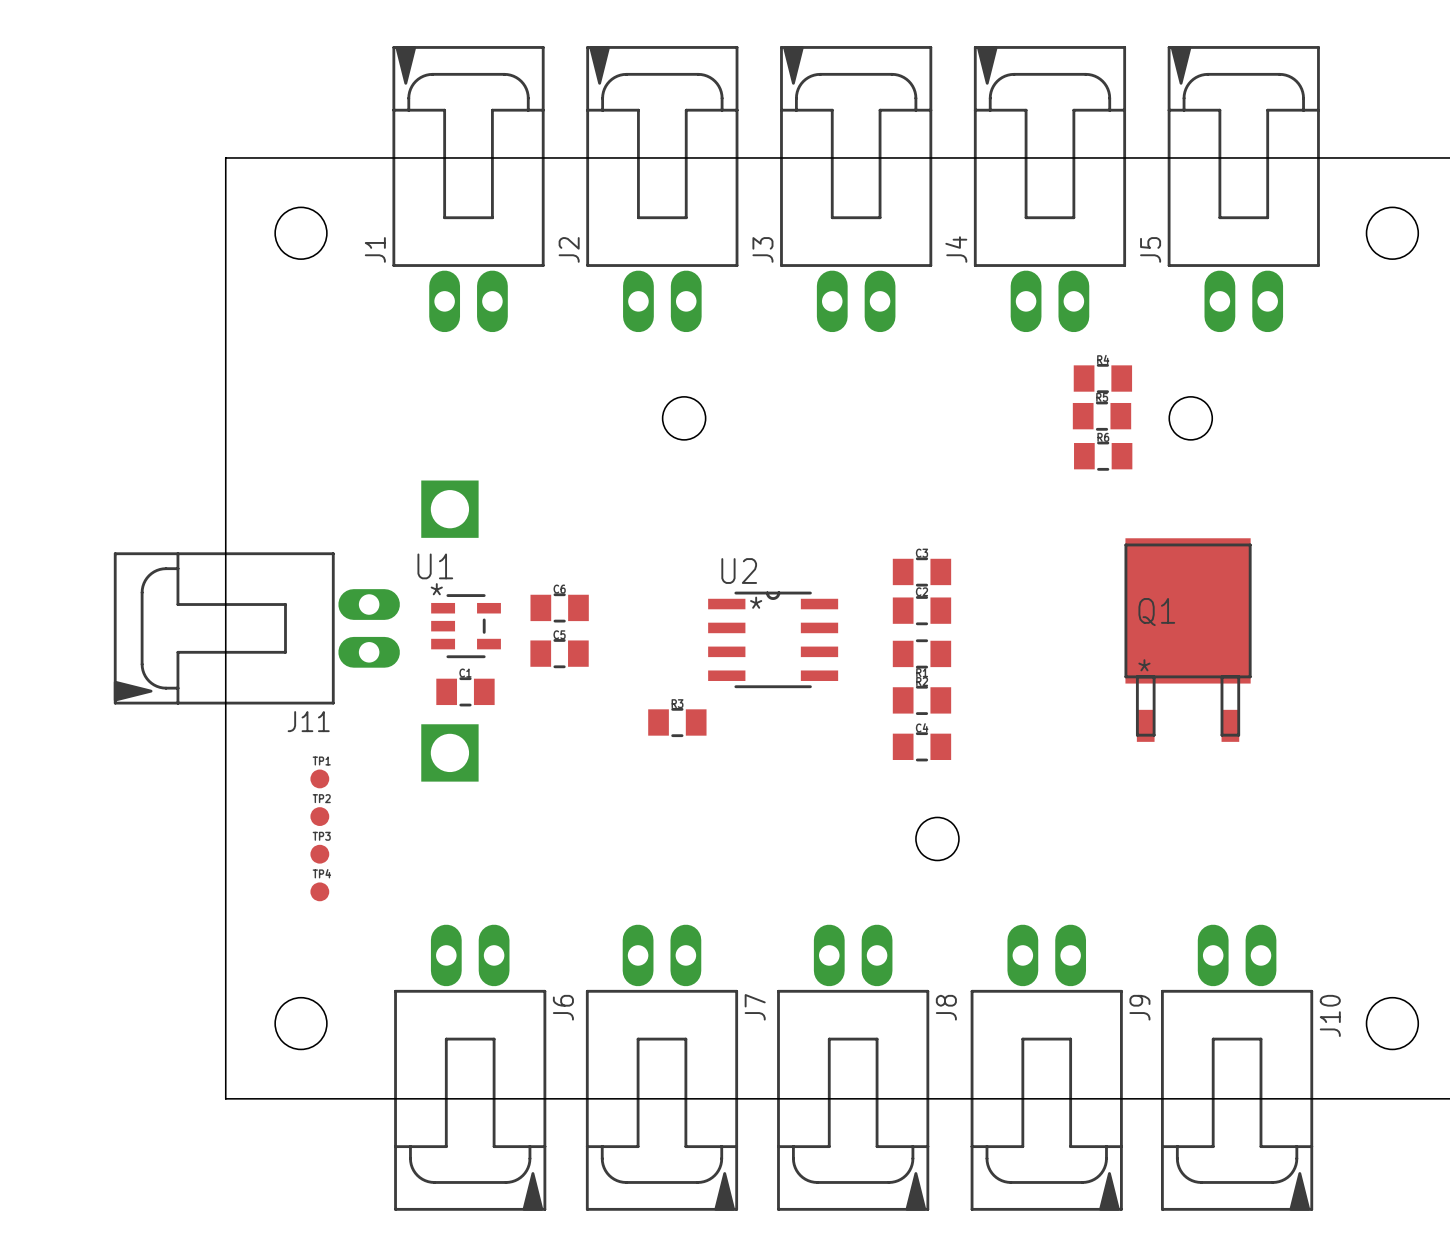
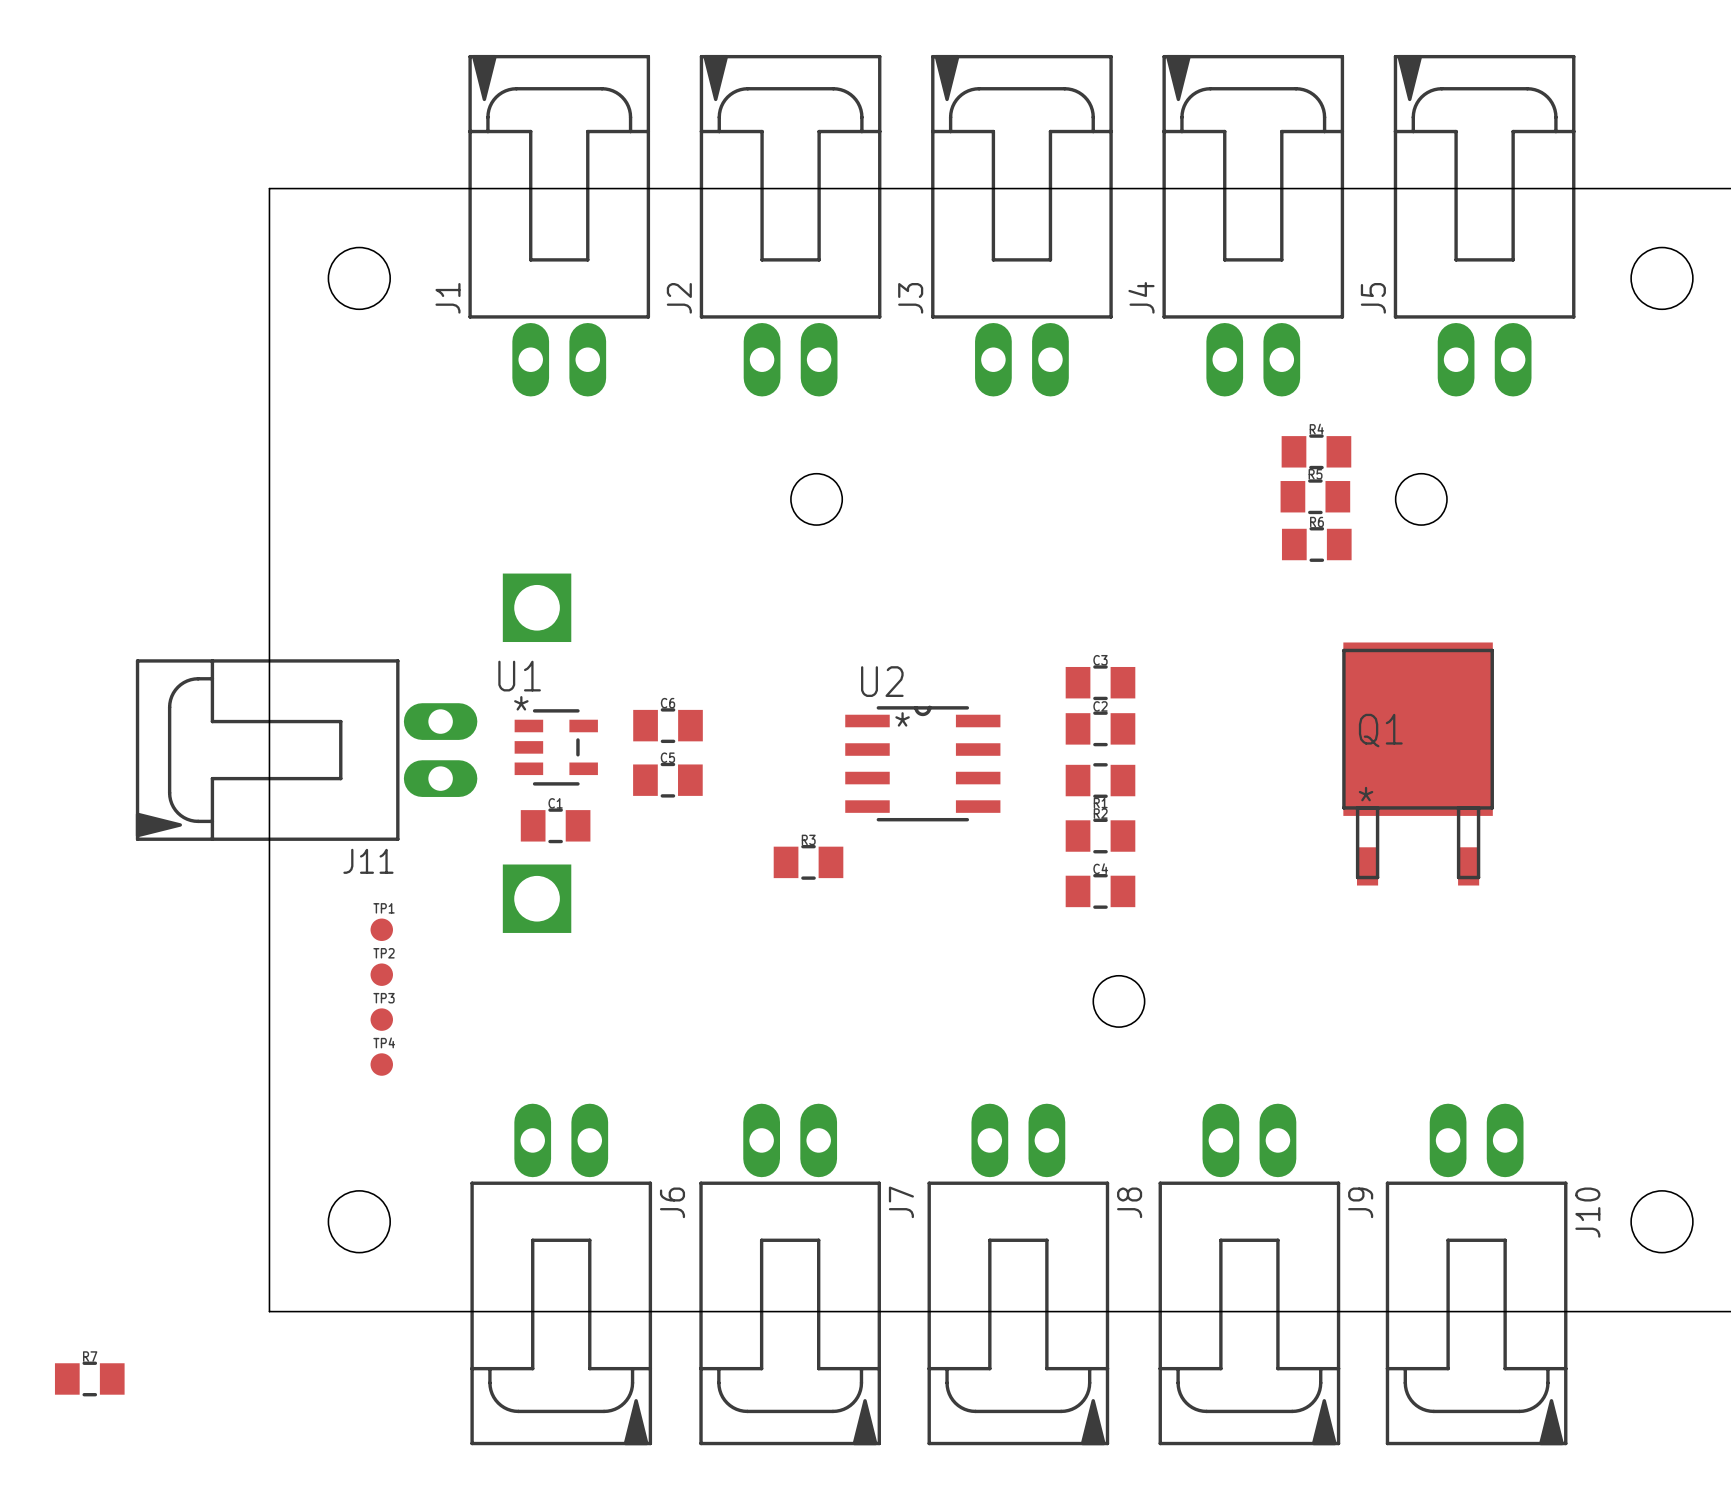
R7: none -> (89, 1378)

